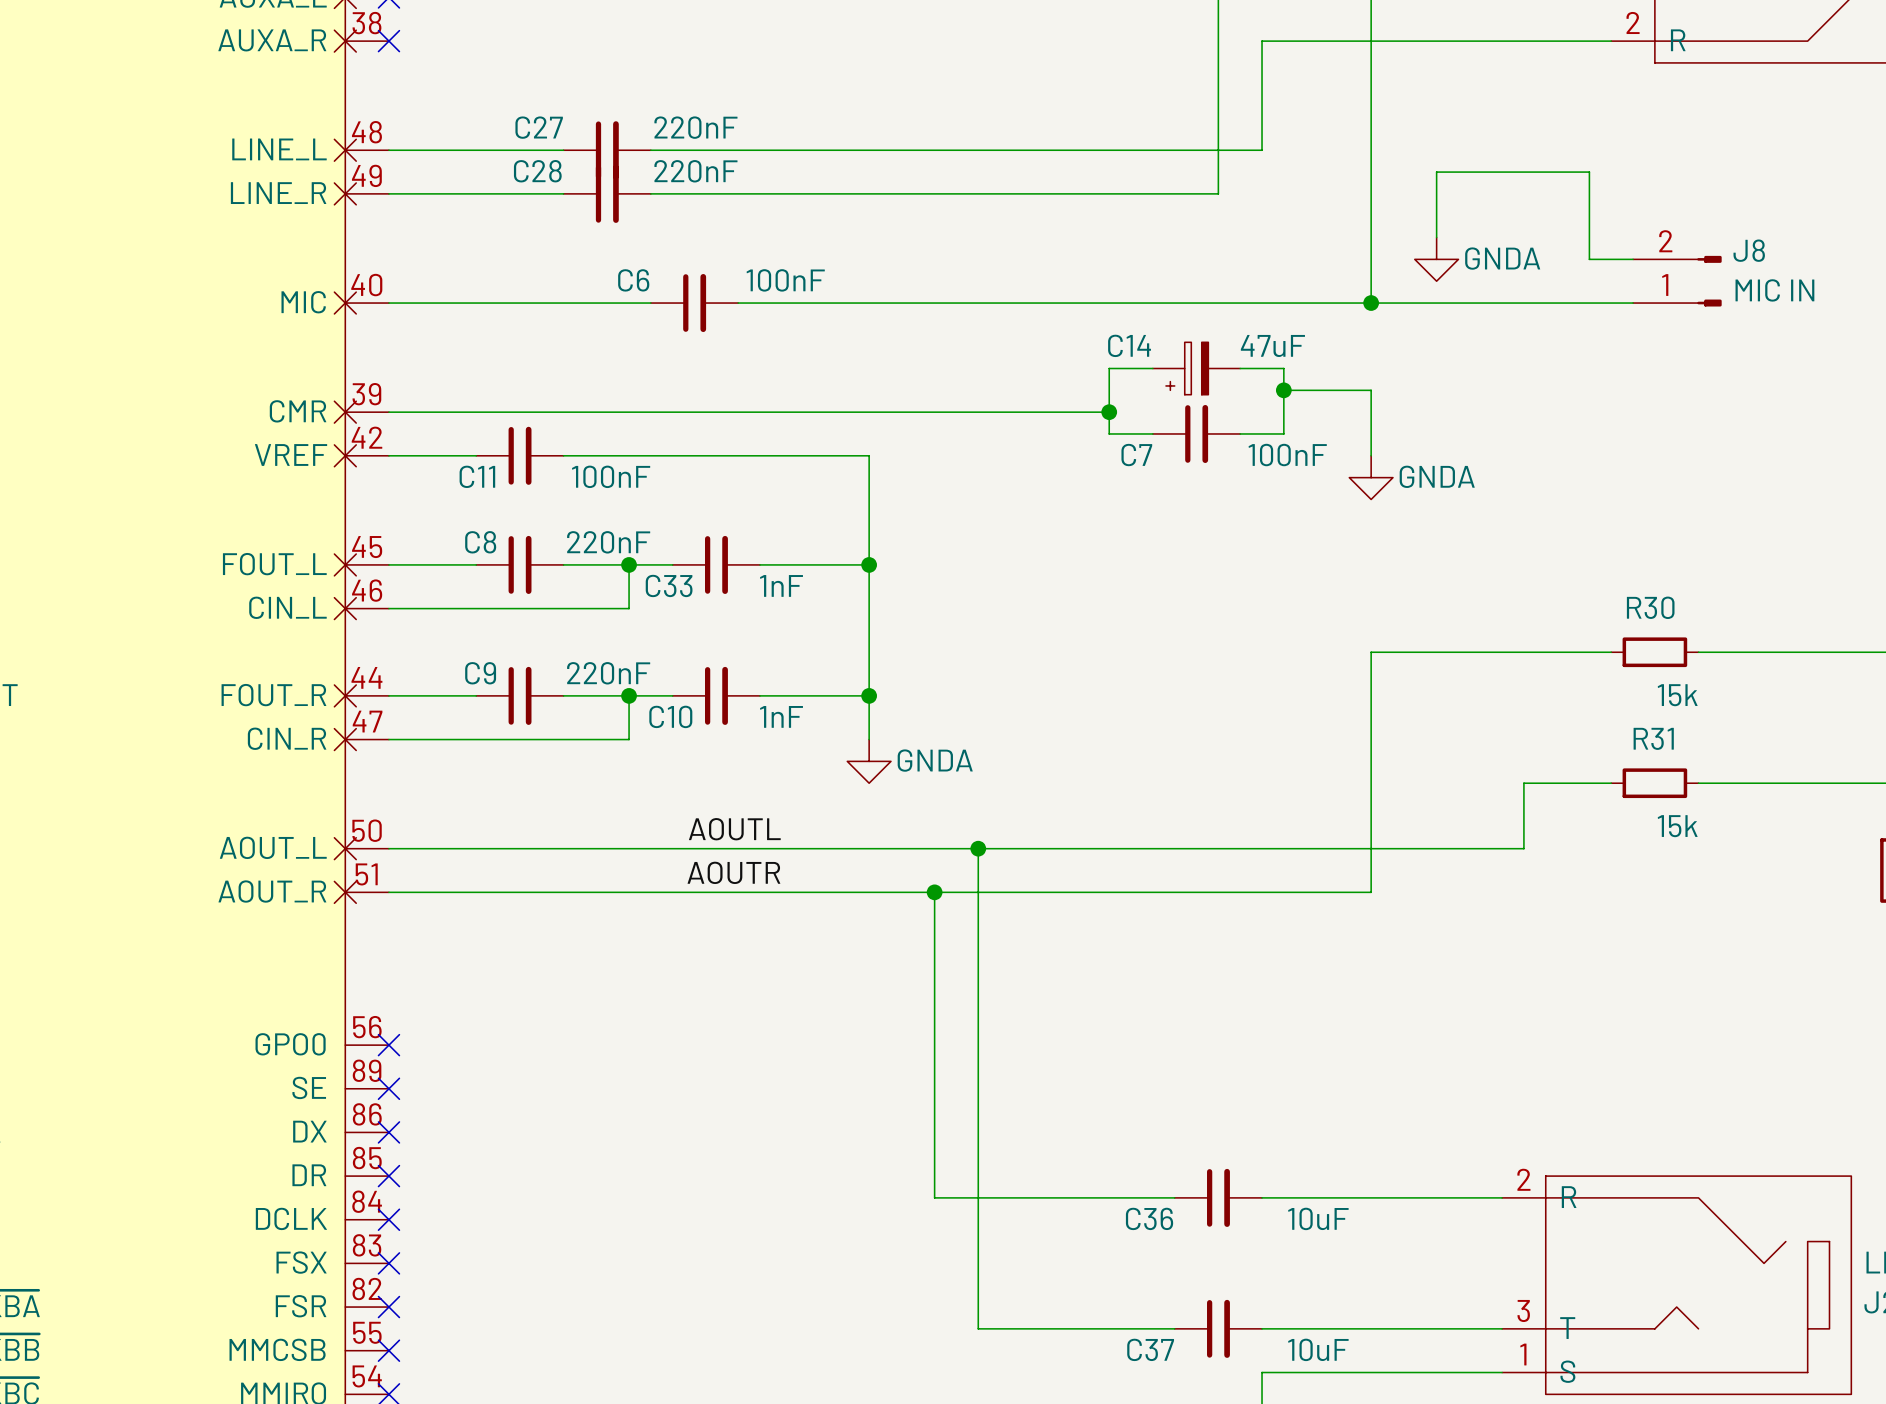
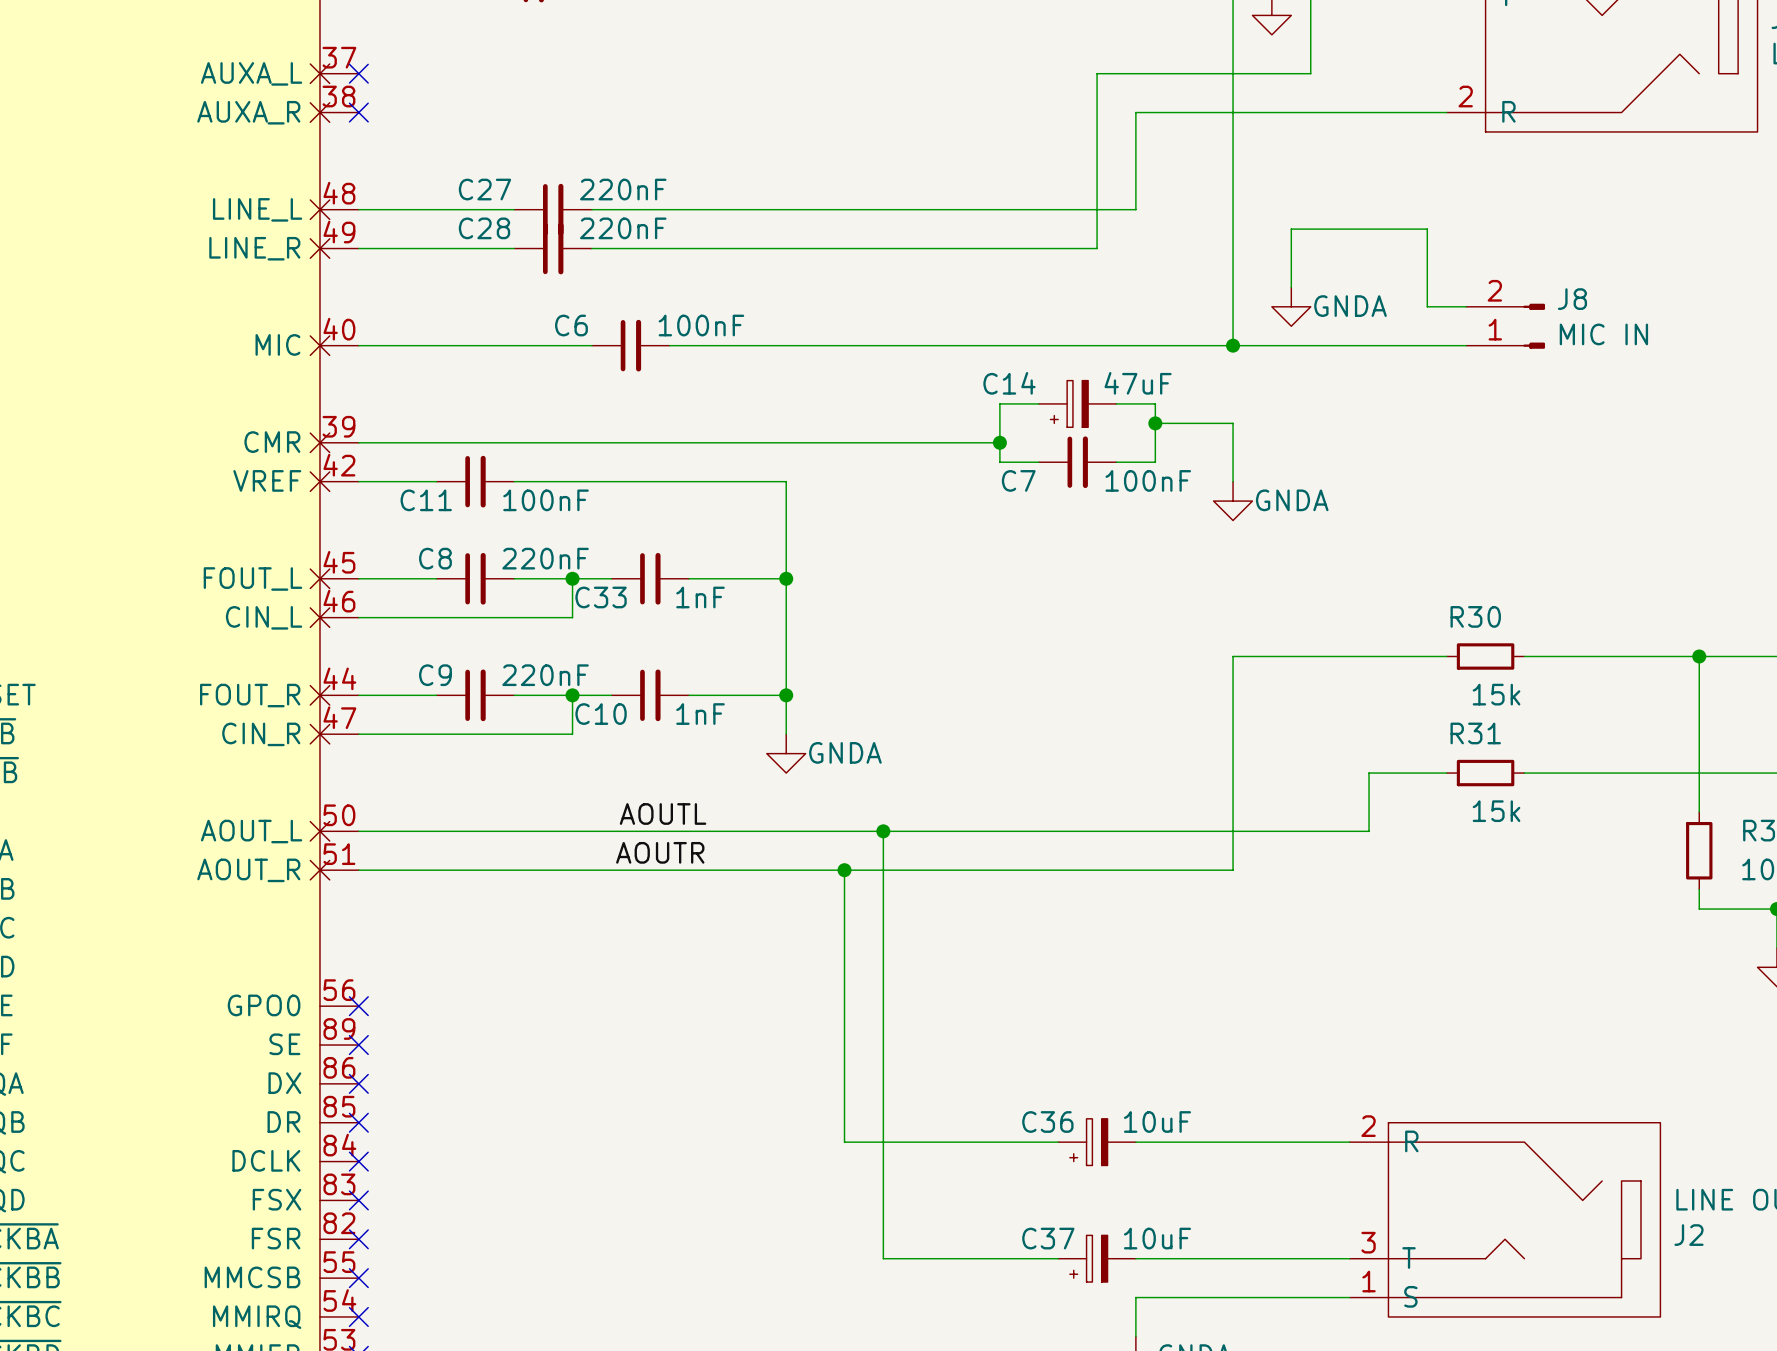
C36 symbol: [1174, 1168, 1263, 1227] -> [1058, 1118, 1136, 1166]
C36 name position: C36 (1149, 1218) -> C36 (1047, 1121)
C36 value position: 10uF (1318, 1218) -> 10uF (1157, 1121)
C37 symbol: [1174, 1299, 1263, 1358] -> [1058, 1235, 1136, 1283]
C37 name position: C37 (1150, 1349) -> C37 (1048, 1238)
C37 value position: 10uF (1318, 1349) -> 10uF (1157, 1238)

